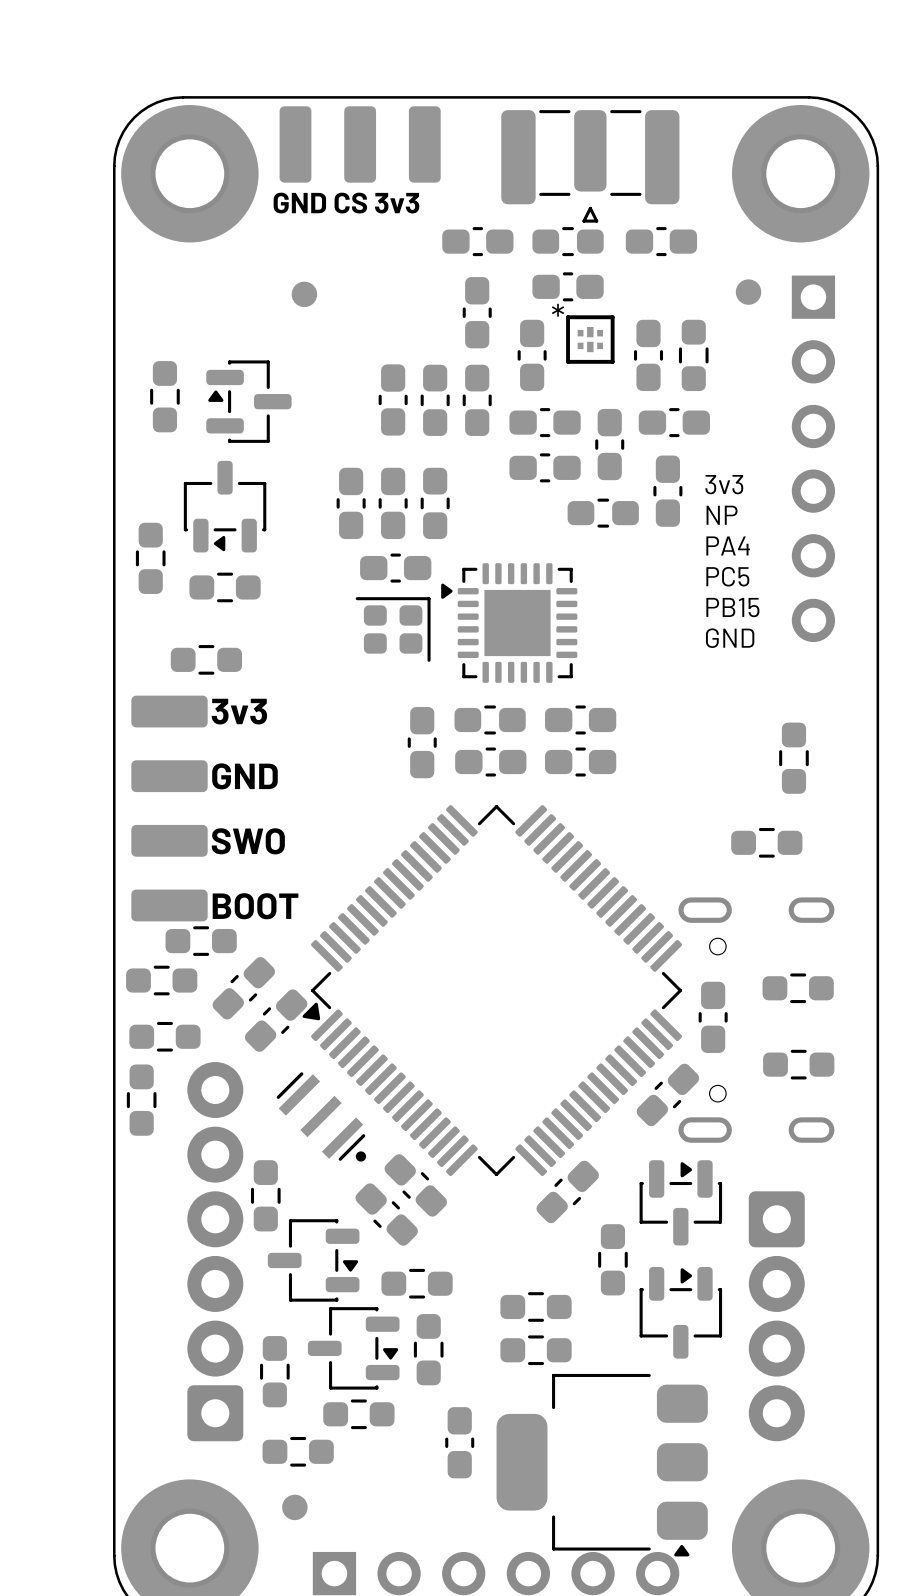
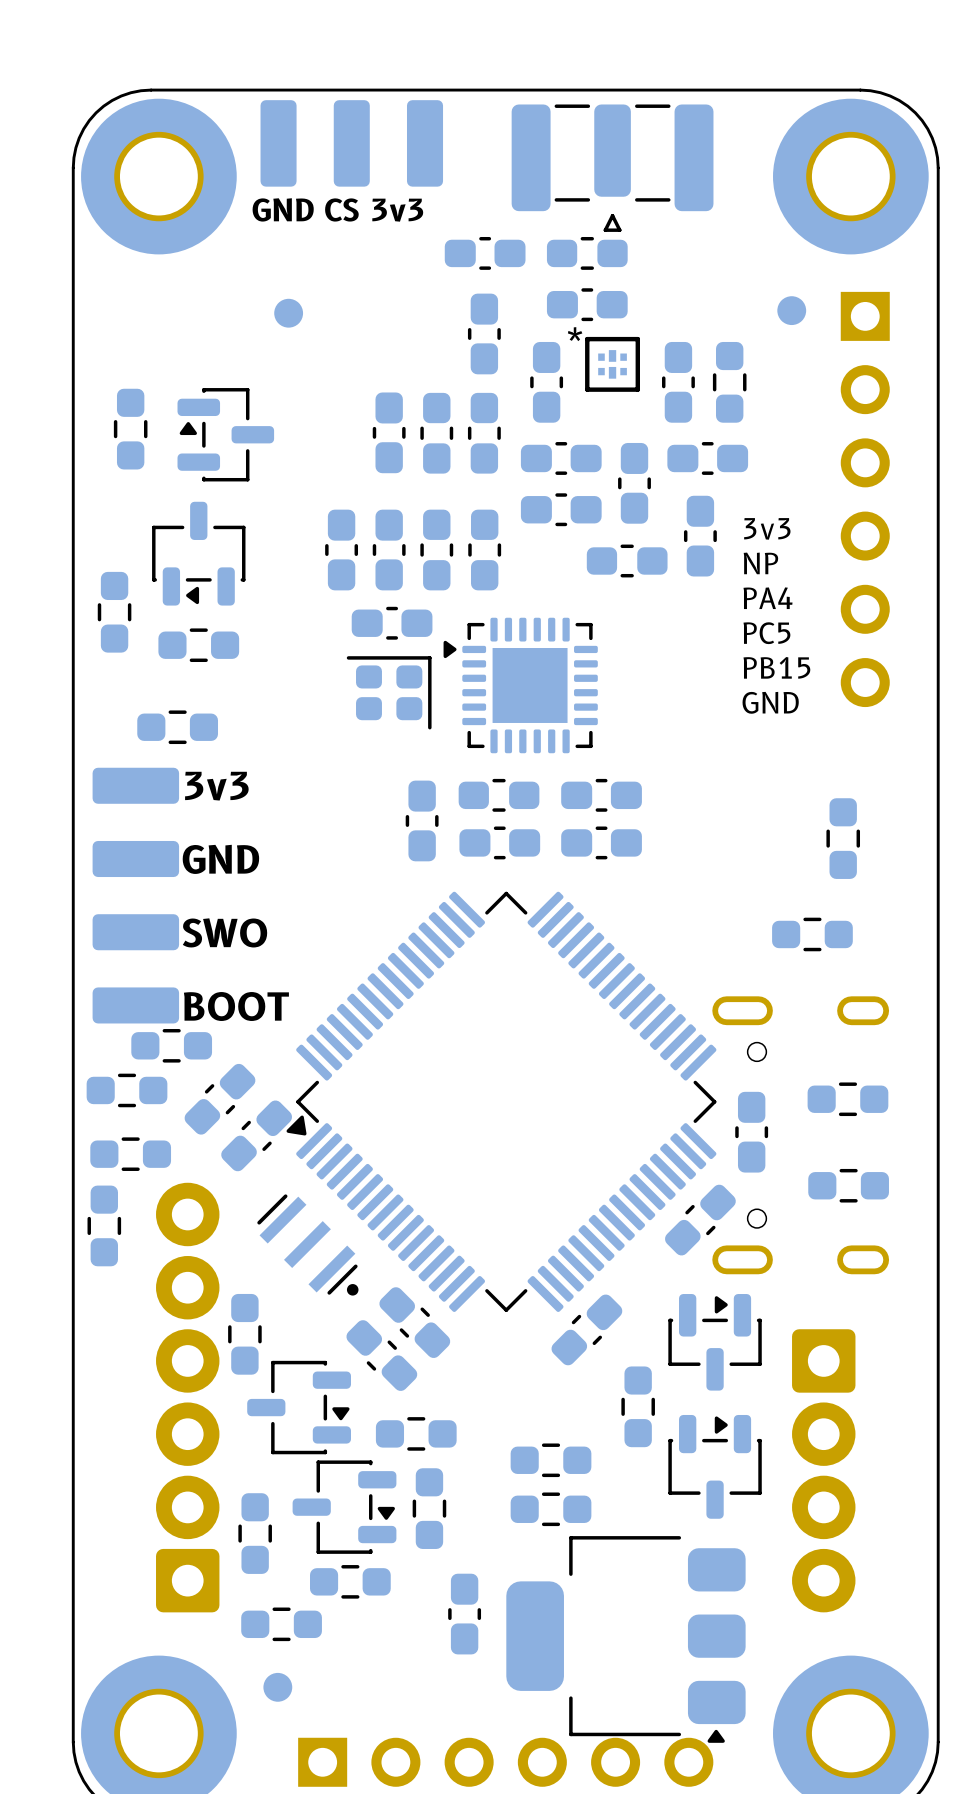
part: (661, 241) -> none
part: none -> (484, 550)

